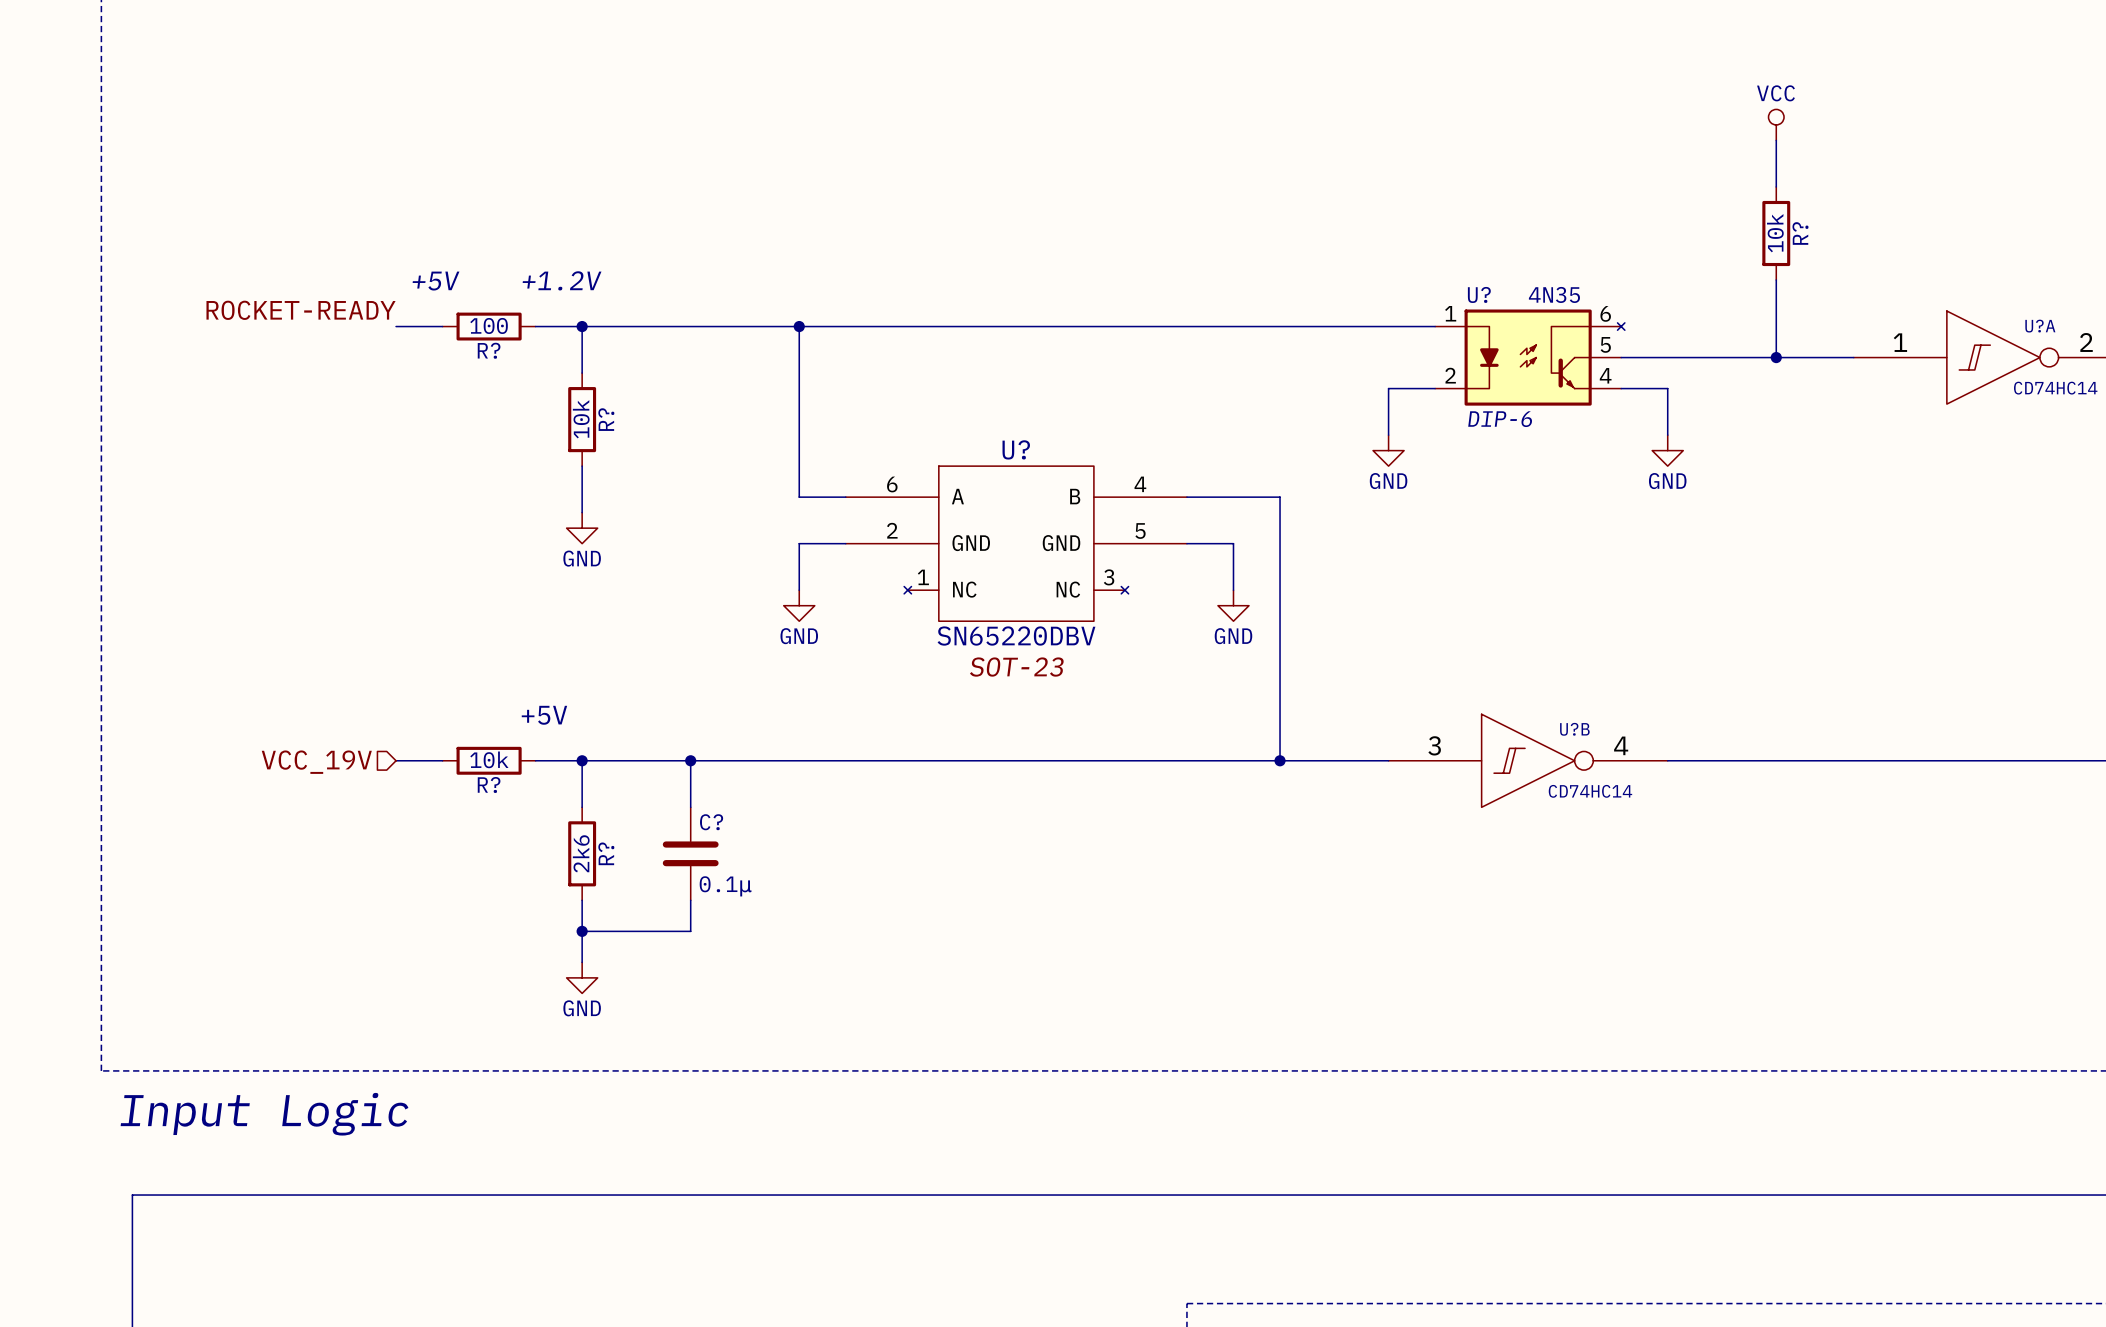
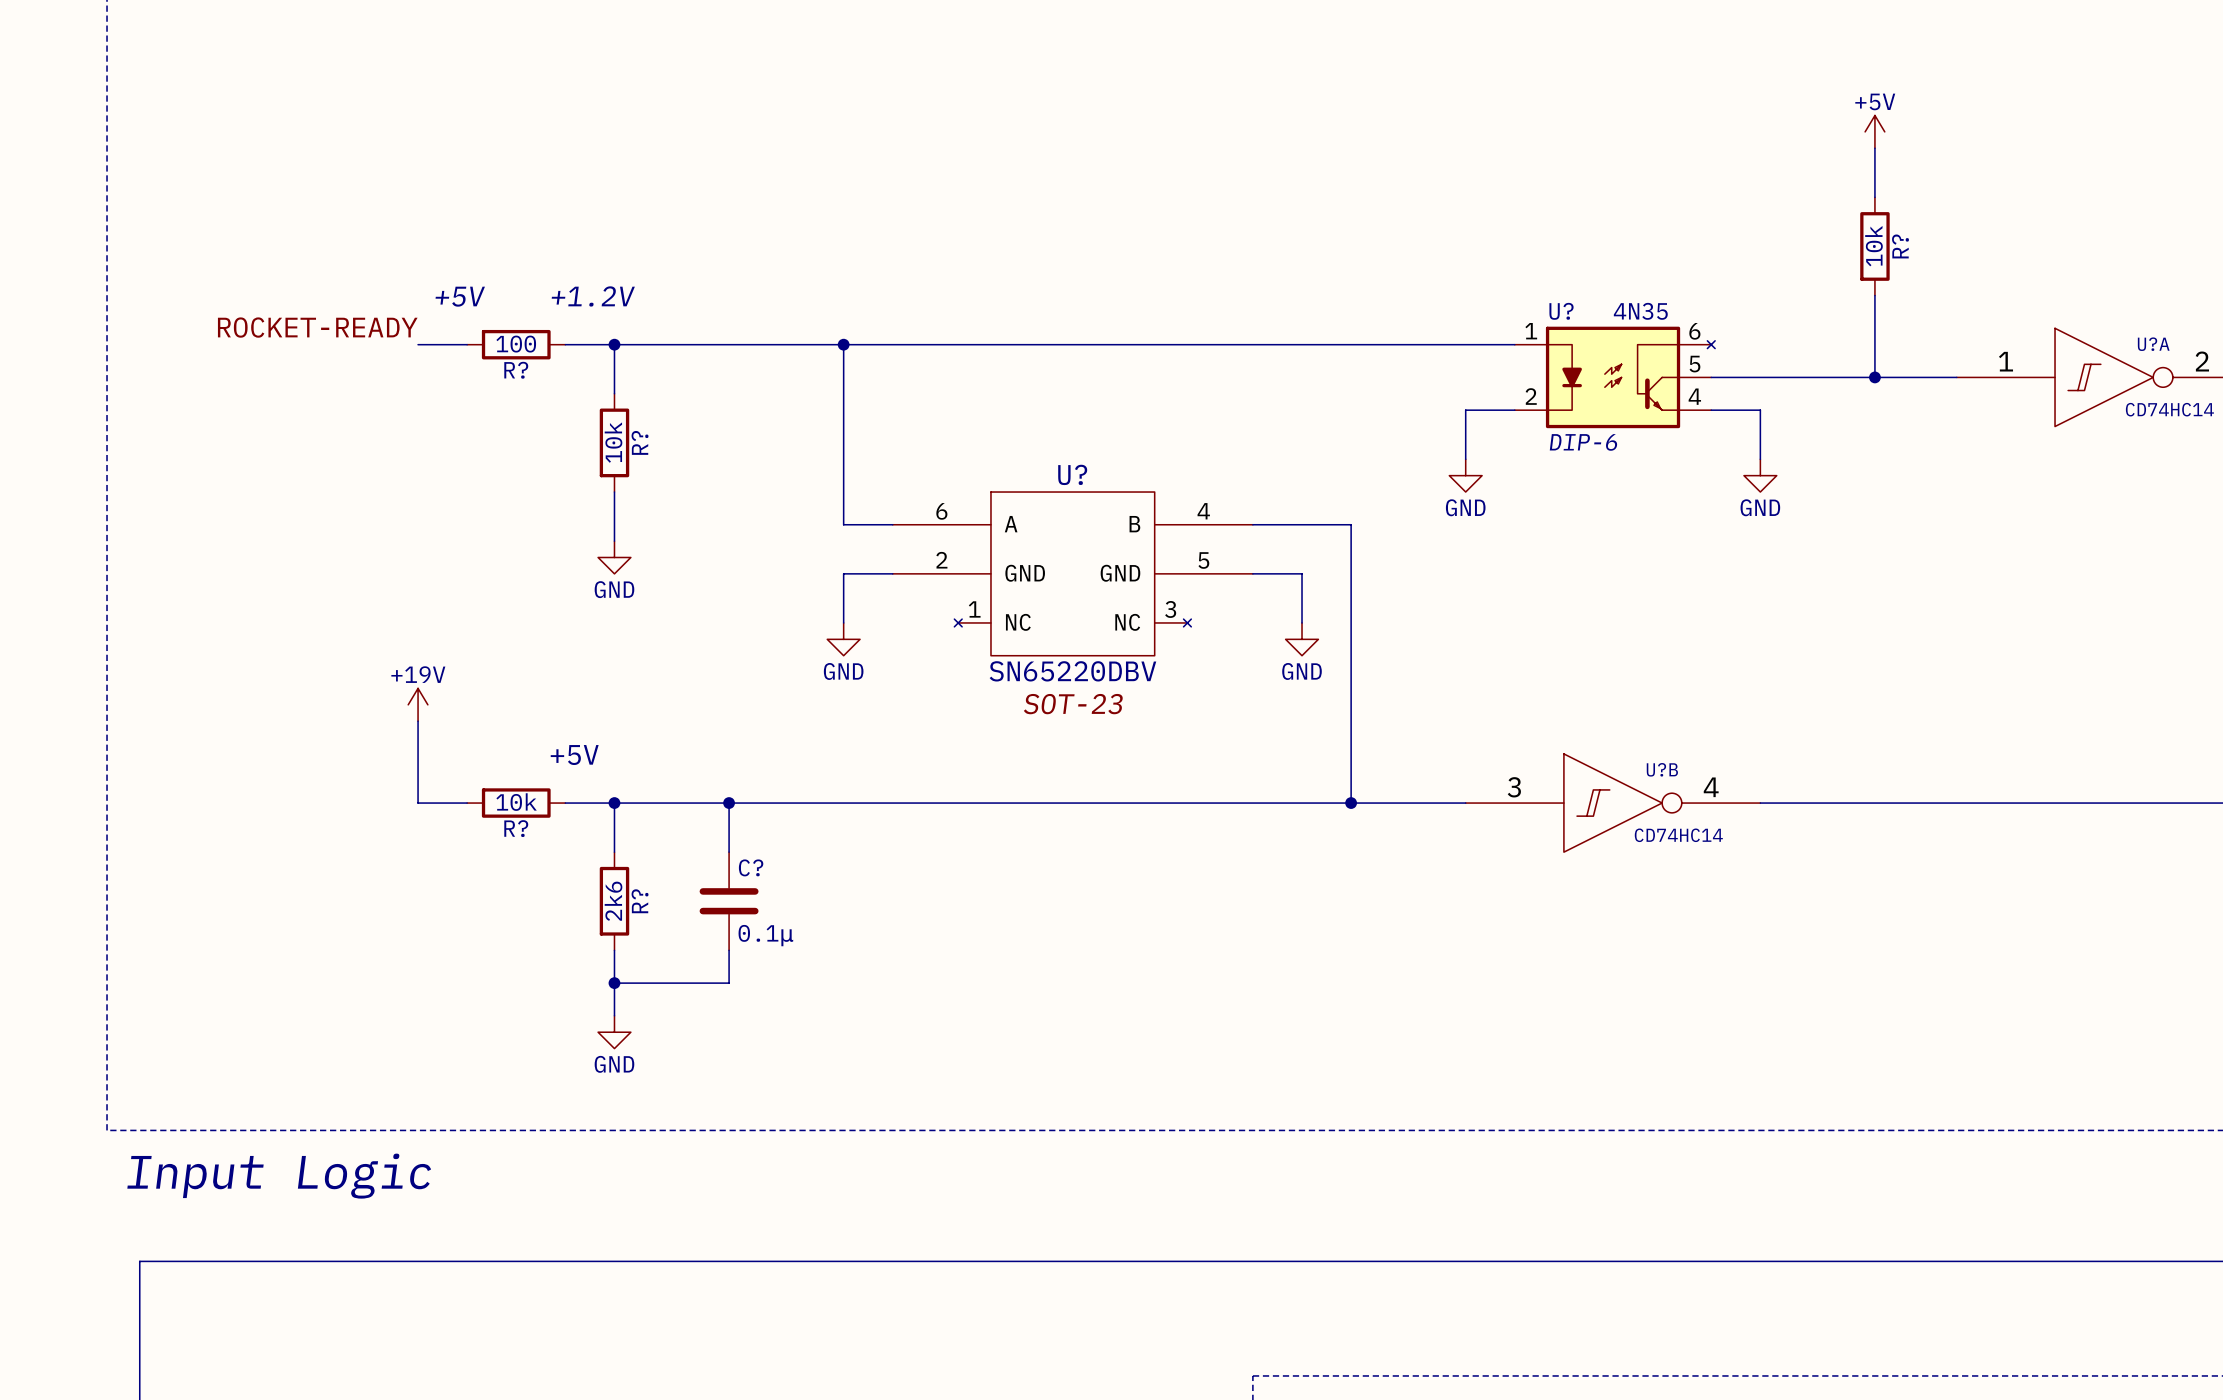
power symbol: VCC (1776, 124) -> +5V (1874, 131)
power symbol: none -> +19V (418, 704)
wire: none -> (418, 721) (418, 803)
hierarchical label: VCC_19V (316, 762) -> none

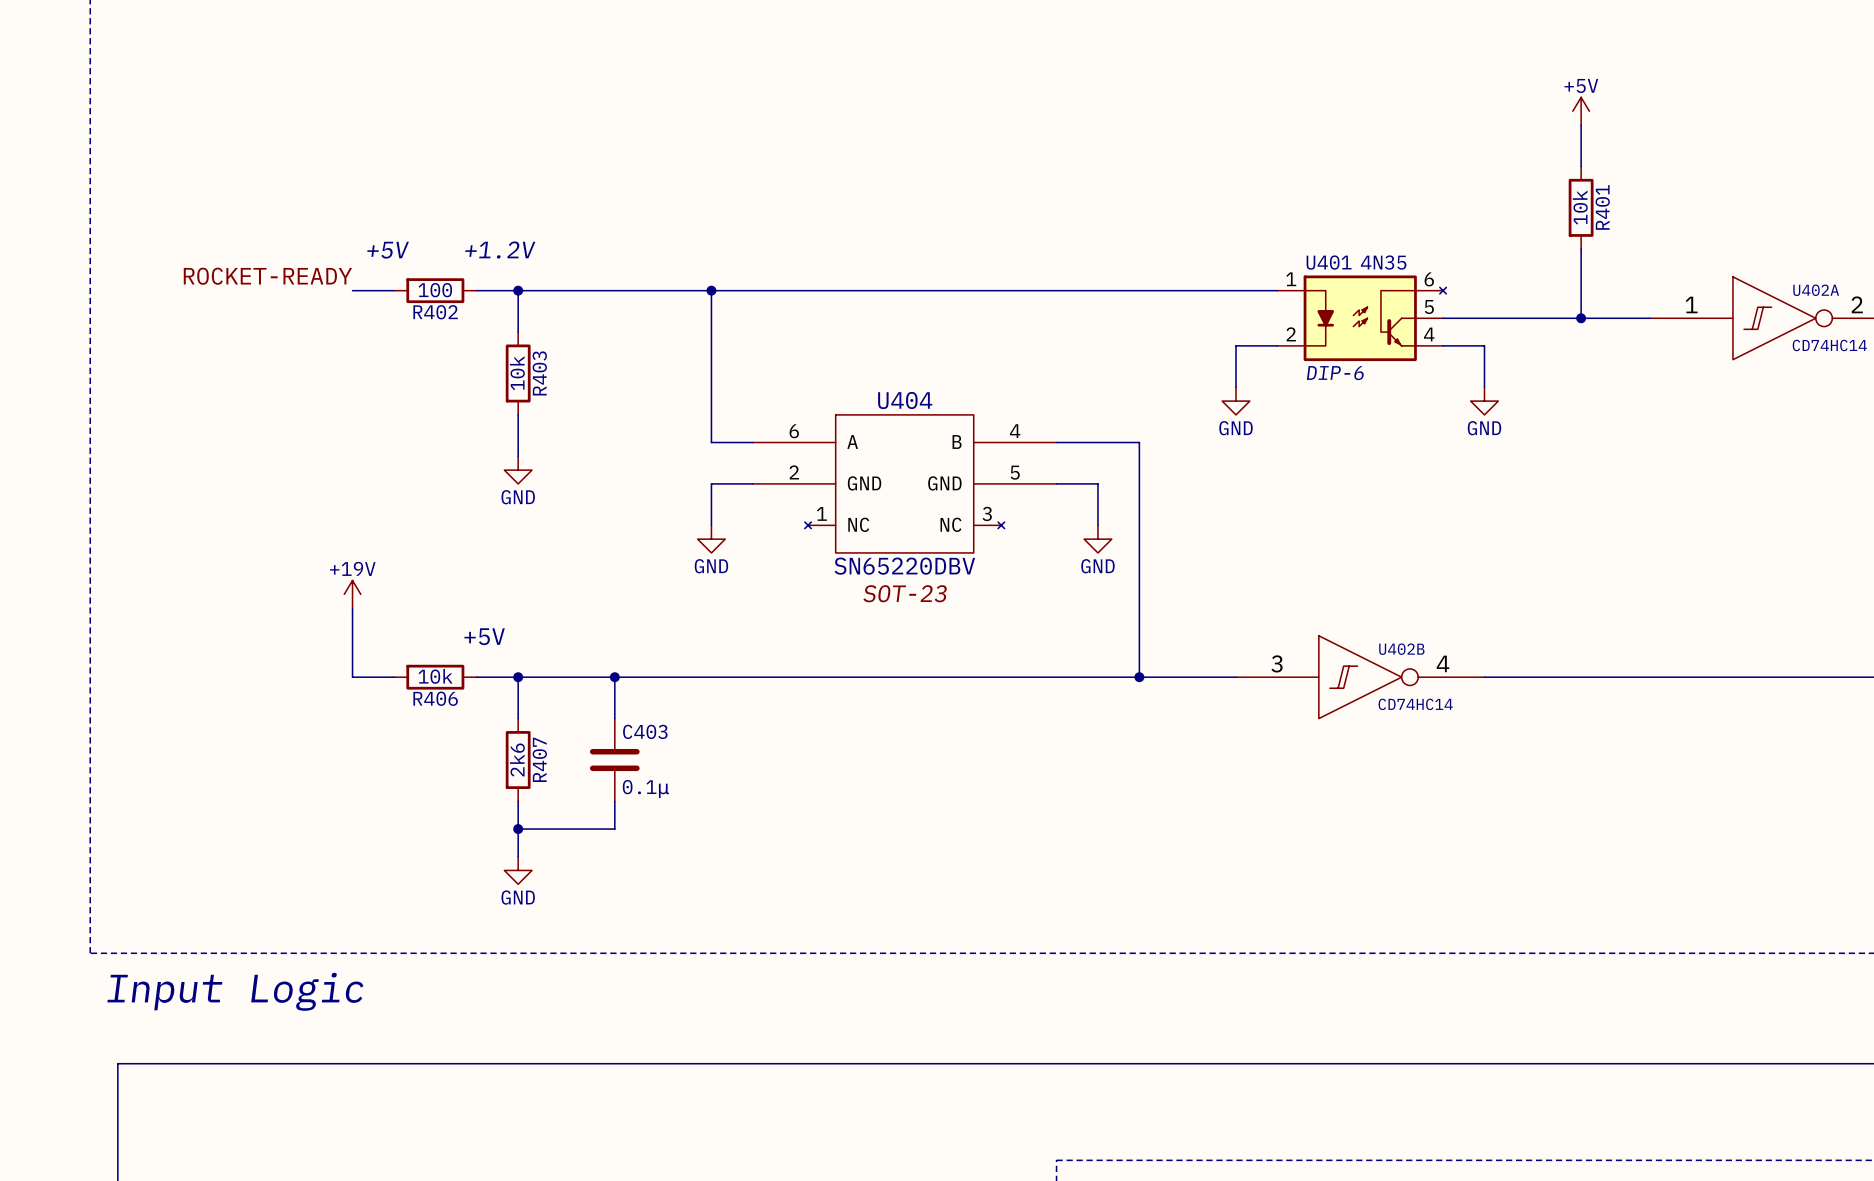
R? name: R? (1900, 246) -> R401 (1602, 207)
U? name: U? (1561, 311) -> U401 (1329, 262)
U?A name: U?A (2153, 344) -> U402A (1816, 290)
R? name: R? (516, 370) -> R402 (435, 312)
R? name: R? (640, 442) -> R403 (539, 373)
U? name: U? (1072, 474) -> U404 (905, 400)
U?B name: U?B (1662, 769) -> U402B (1401, 649)
R? name: R? (516, 828) -> R406 (435, 698)
C? name: C? (751, 867) -> C403 (645, 731)
R? name: R? (640, 901) -> R407 (539, 759)

